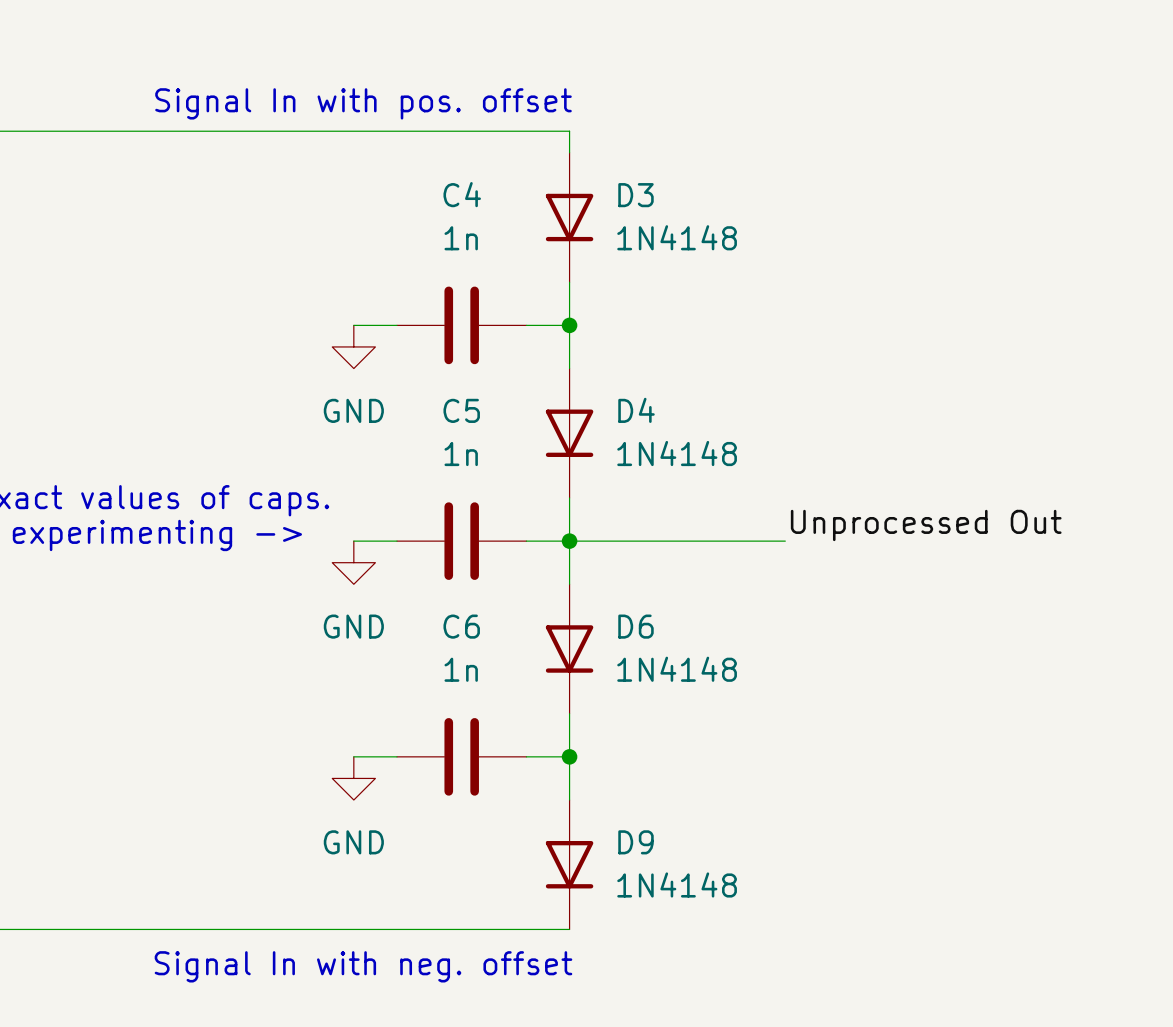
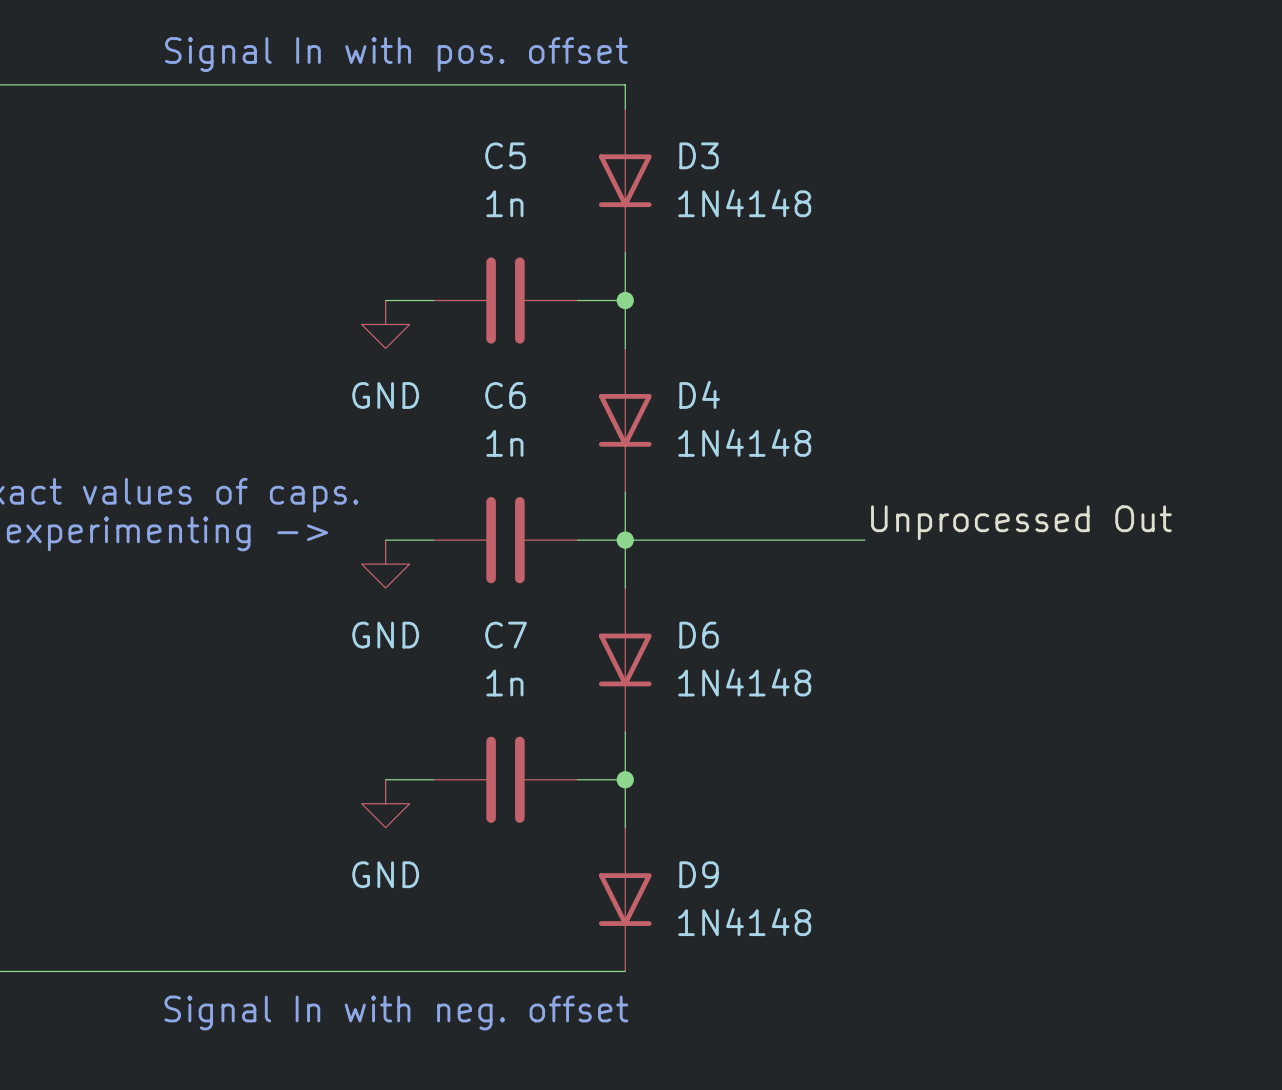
C4 name: C4 (462, 194) -> C5 (505, 155)
C5 name: C5 (461, 410) -> C6 (505, 395)
C6 name: C6 (461, 626) -> C7 (506, 635)

